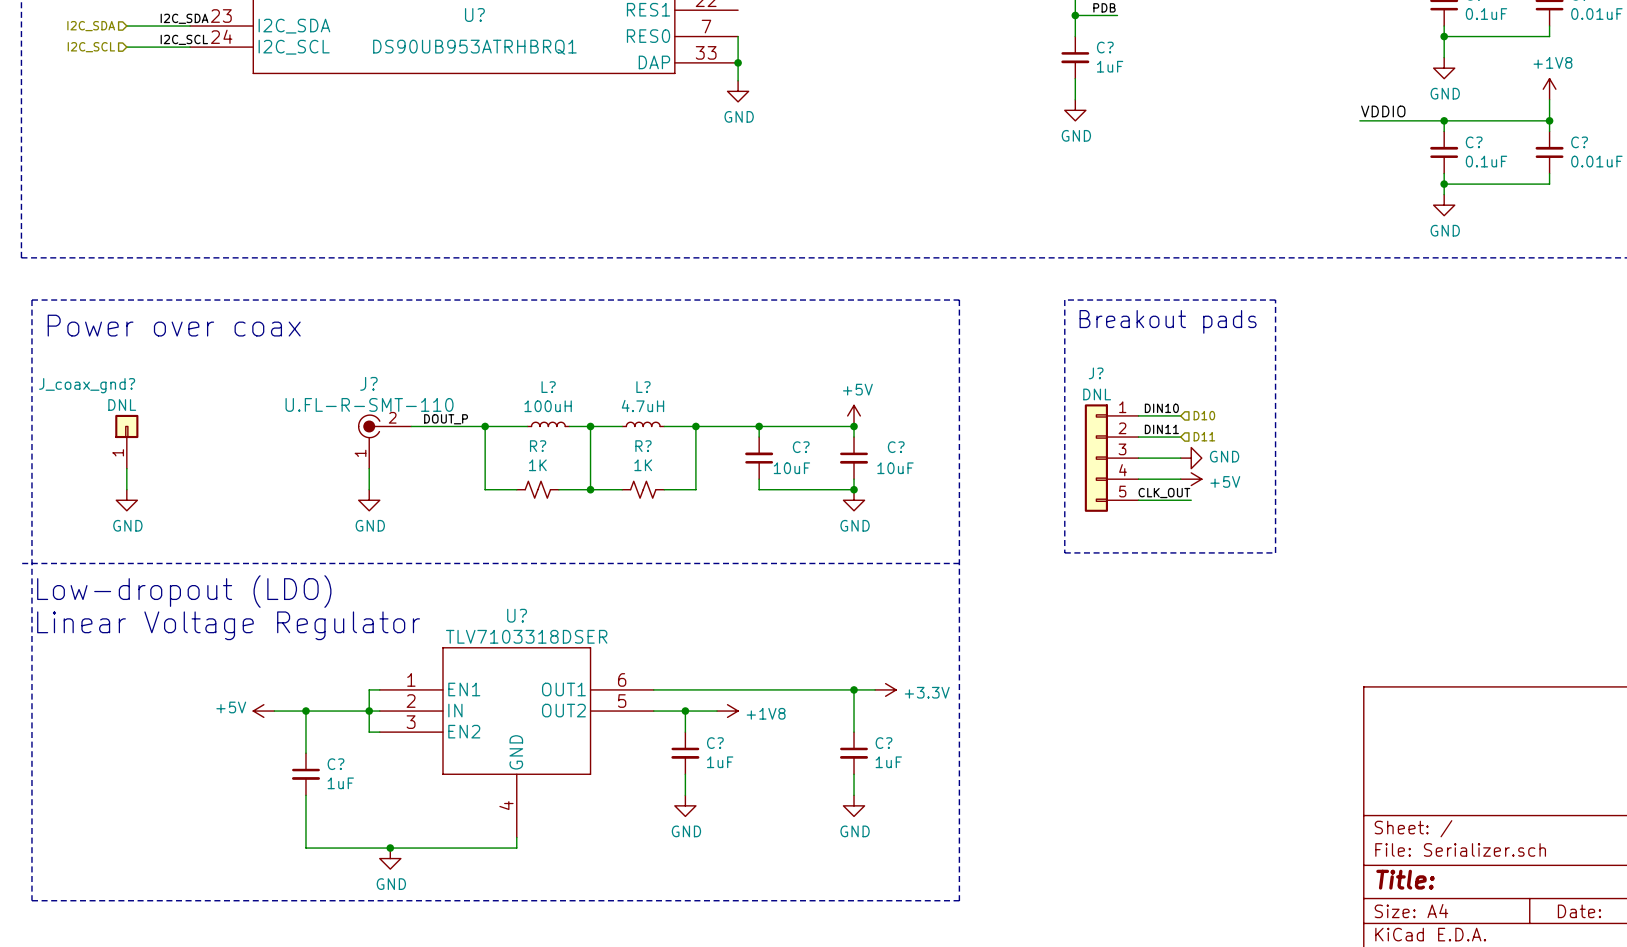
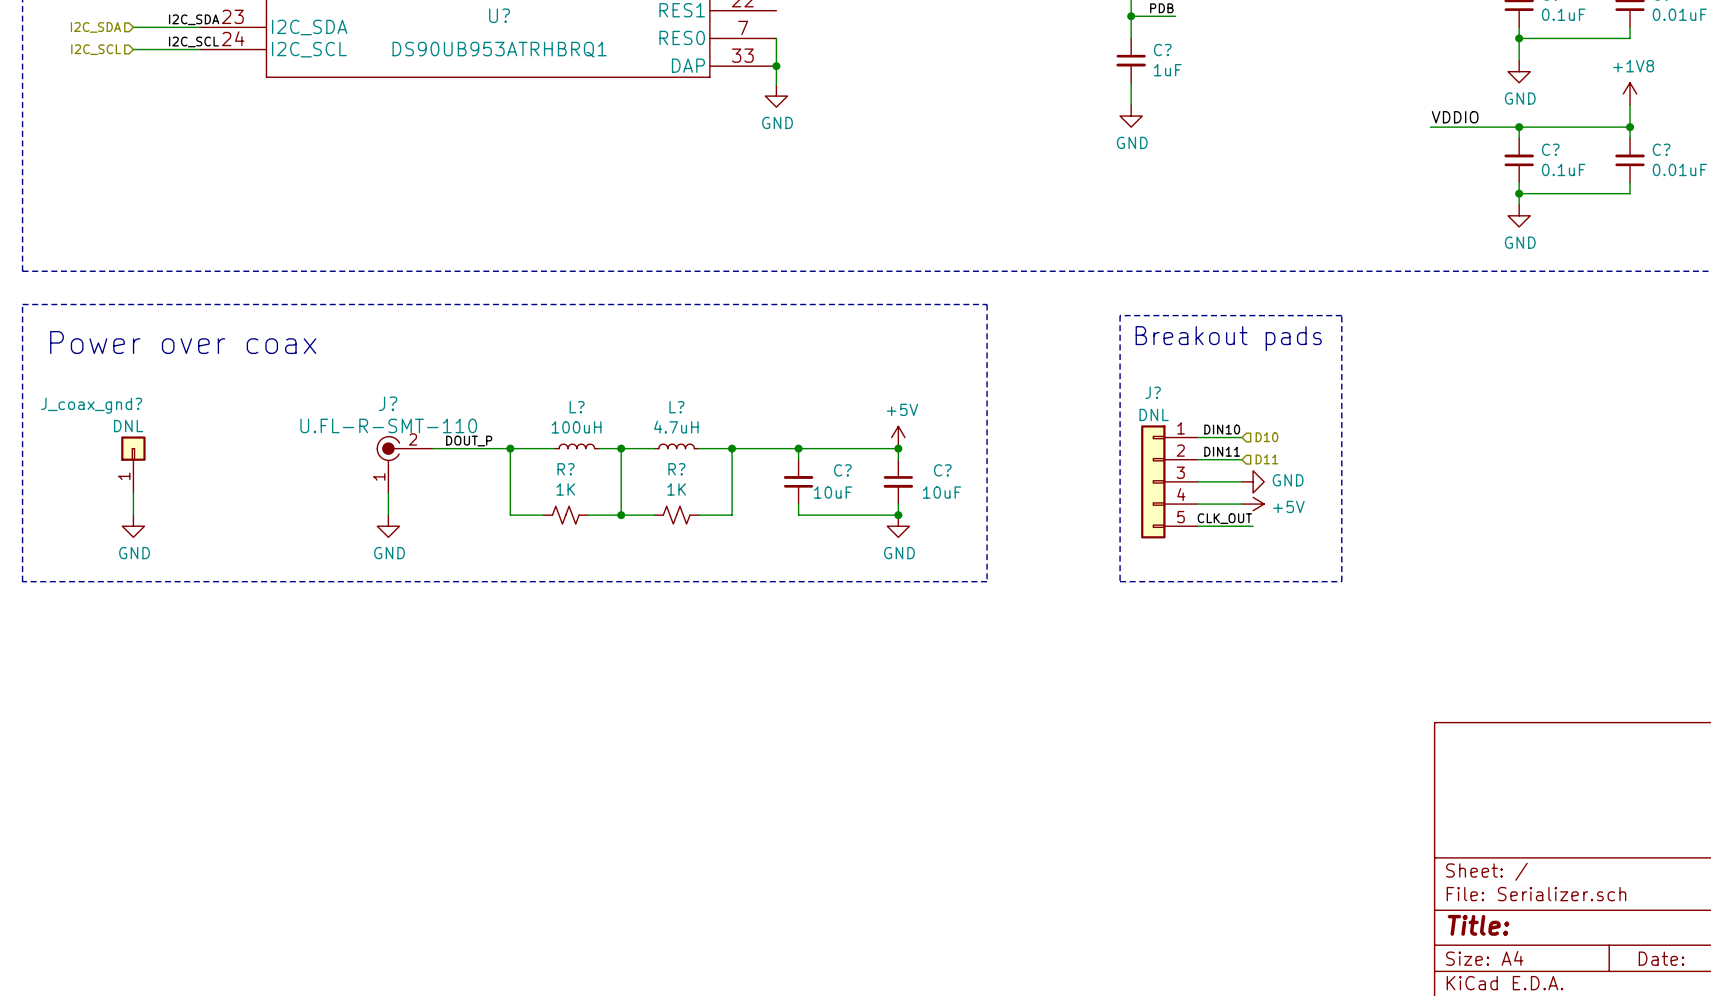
line: none -> (22, 304) (987, 304) (987, 581) (22, 581) (22, 304)
line: (31, 300) (959, 300) (959, 900) (31, 900) (31, 300) -> none
line: (21, 563) (959, 563) -> none
text: Low-dropout (LDO) (184, 591) -> none
text: Linear Voltage Regulator (228, 625) -> none
wire: (379, 689) (369, 689) (369, 732) (379, 732) -> none
wire: (653, 689) (875, 689) -> none
wire: (854, 689) (854, 732) -> none
junction: (854, 689) -> none
power symbol: +3.3V (885, 689) -> none
power symbol: +5V (263, 711) -> none
wire: (274, 711) (379, 711) -> none
wire: (305, 711) (305, 753) -> none
junction: (305, 711) -> none
junction: (369, 711) -> none
wire: (653, 711) (717, 711) -> none
wire: (685, 711) (685, 732) -> none
junction: (685, 711) -> none
power symbol: +1V8 (727, 711) -> none
U?: TLV7103318DSER (516, 742) -> none
C?: 1uF (685, 753) -> none
C?: 1uF (854, 753) -> none
C?: 1uF (305, 774) -> none
wire: (685, 774) (685, 795) -> none
wire: (854, 774) (854, 795) -> none
wire: (305, 795) (305, 848) (516, 848) (516, 837) -> none
power symbol: GND (685, 805) -> none
power symbol: GND (854, 805) -> none
junction: (390, 848) -> none
power symbol: GND (390, 858) -> none

